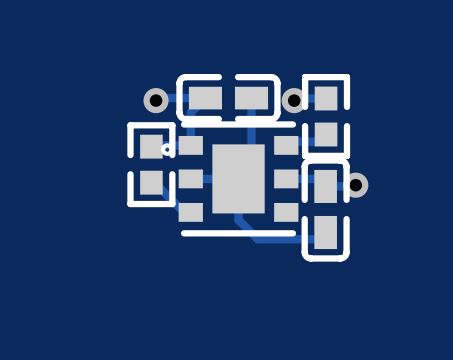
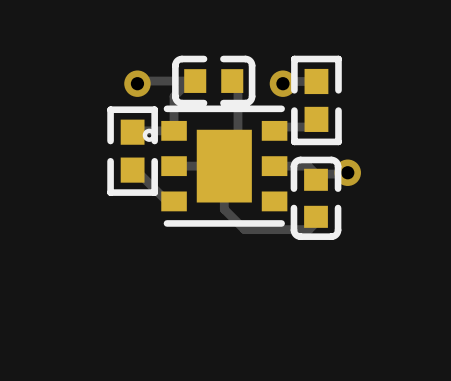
part footprint: [176, 74, 281, 123] -> [172, 55, 256, 107]
part footprint: [301, 157, 350, 262] -> [290, 156, 342, 240]

